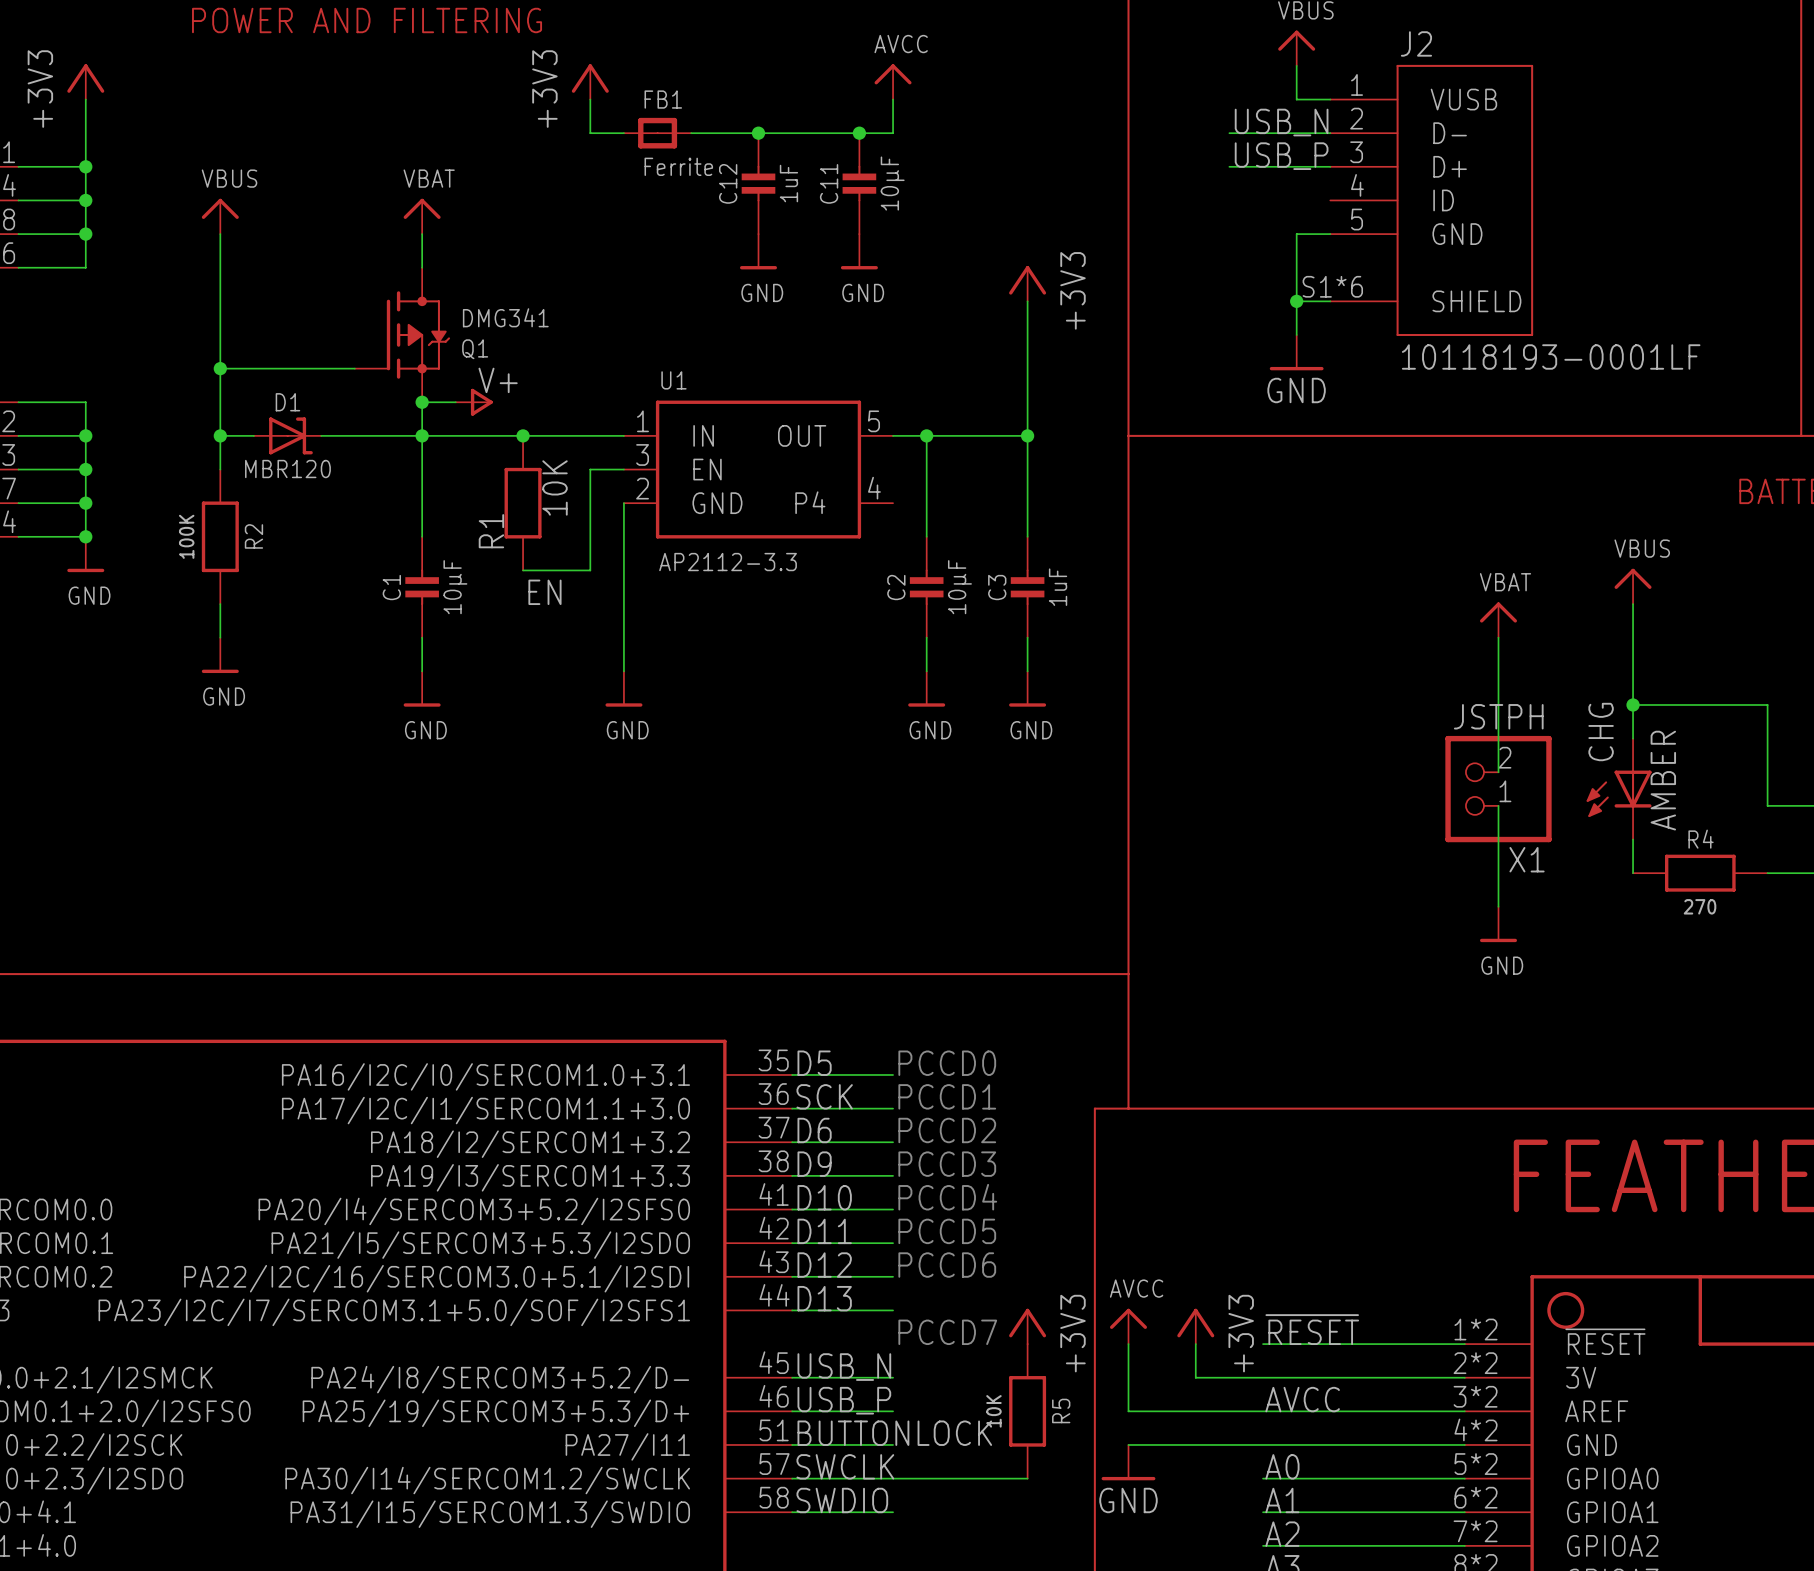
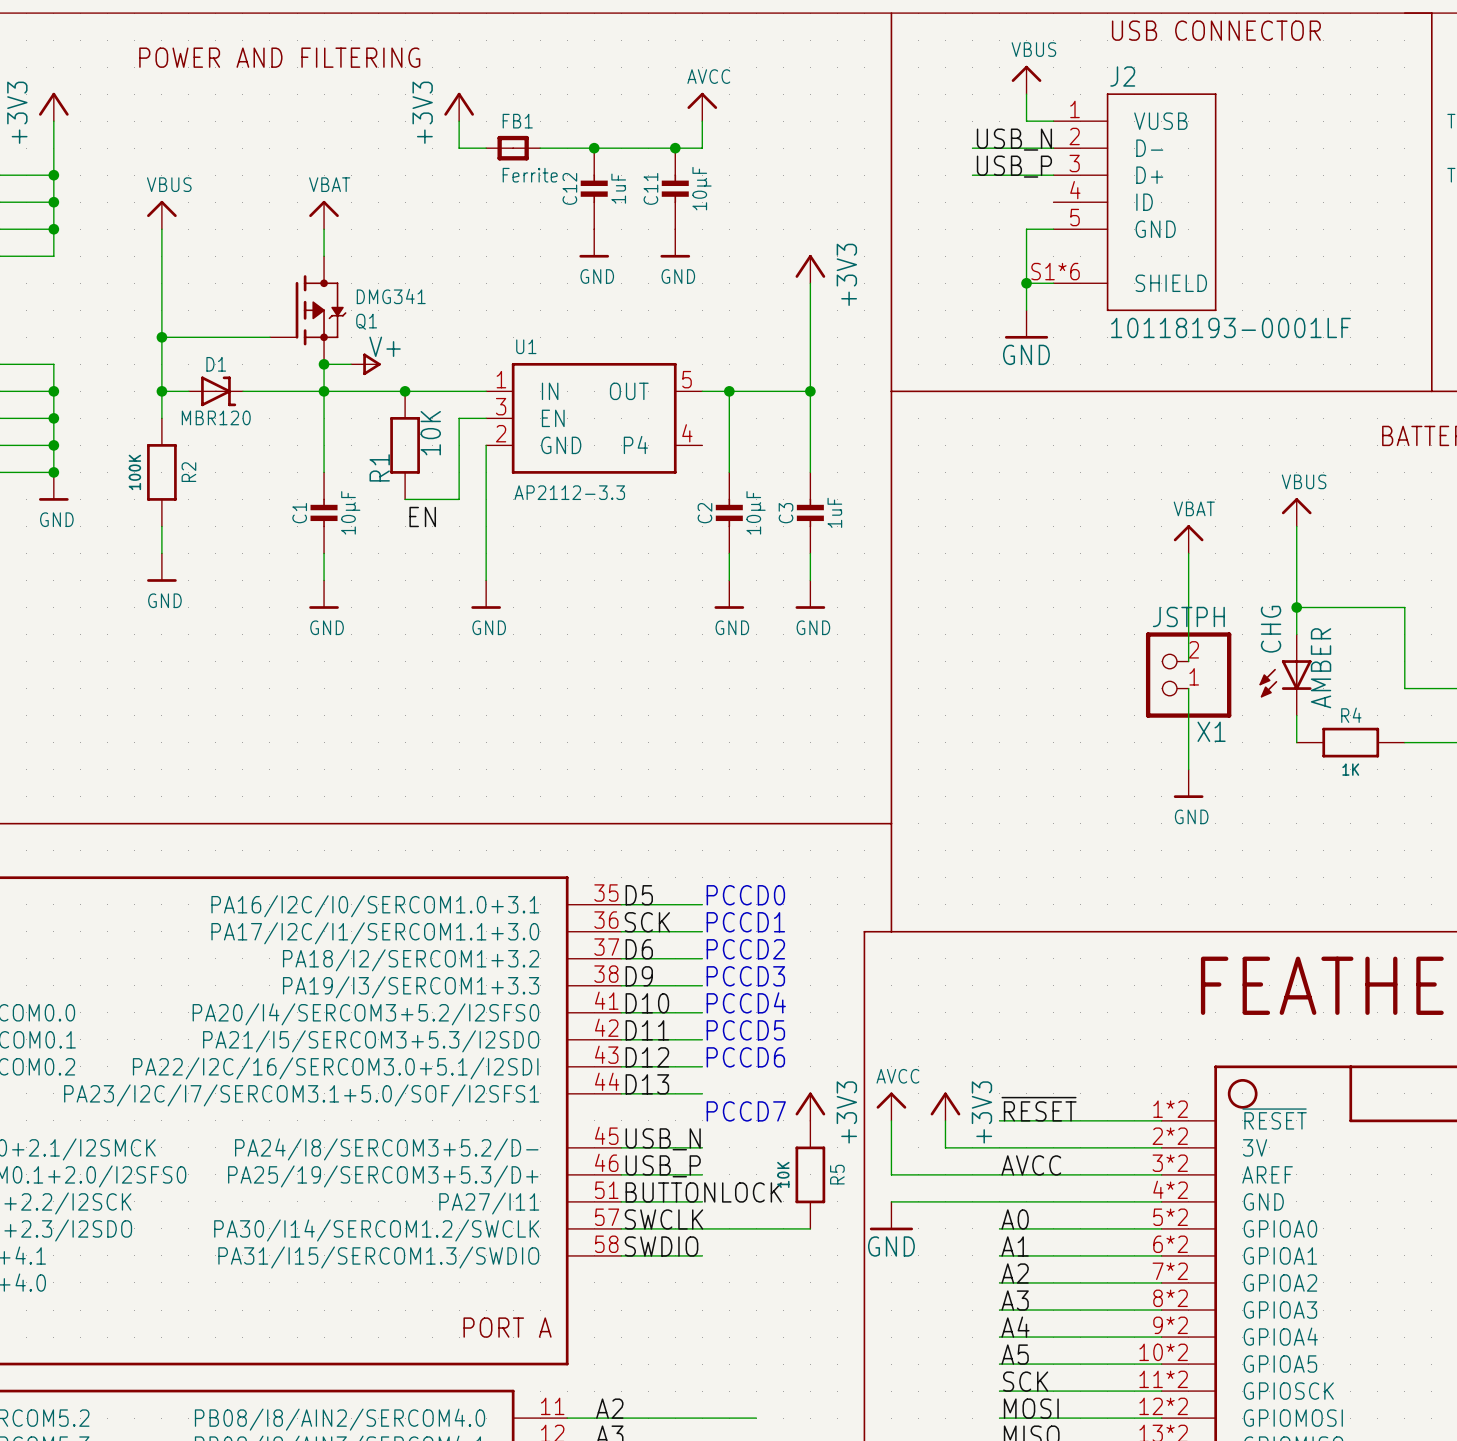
R4 value: 270 (1700, 906) -> 1K (1350, 769)

